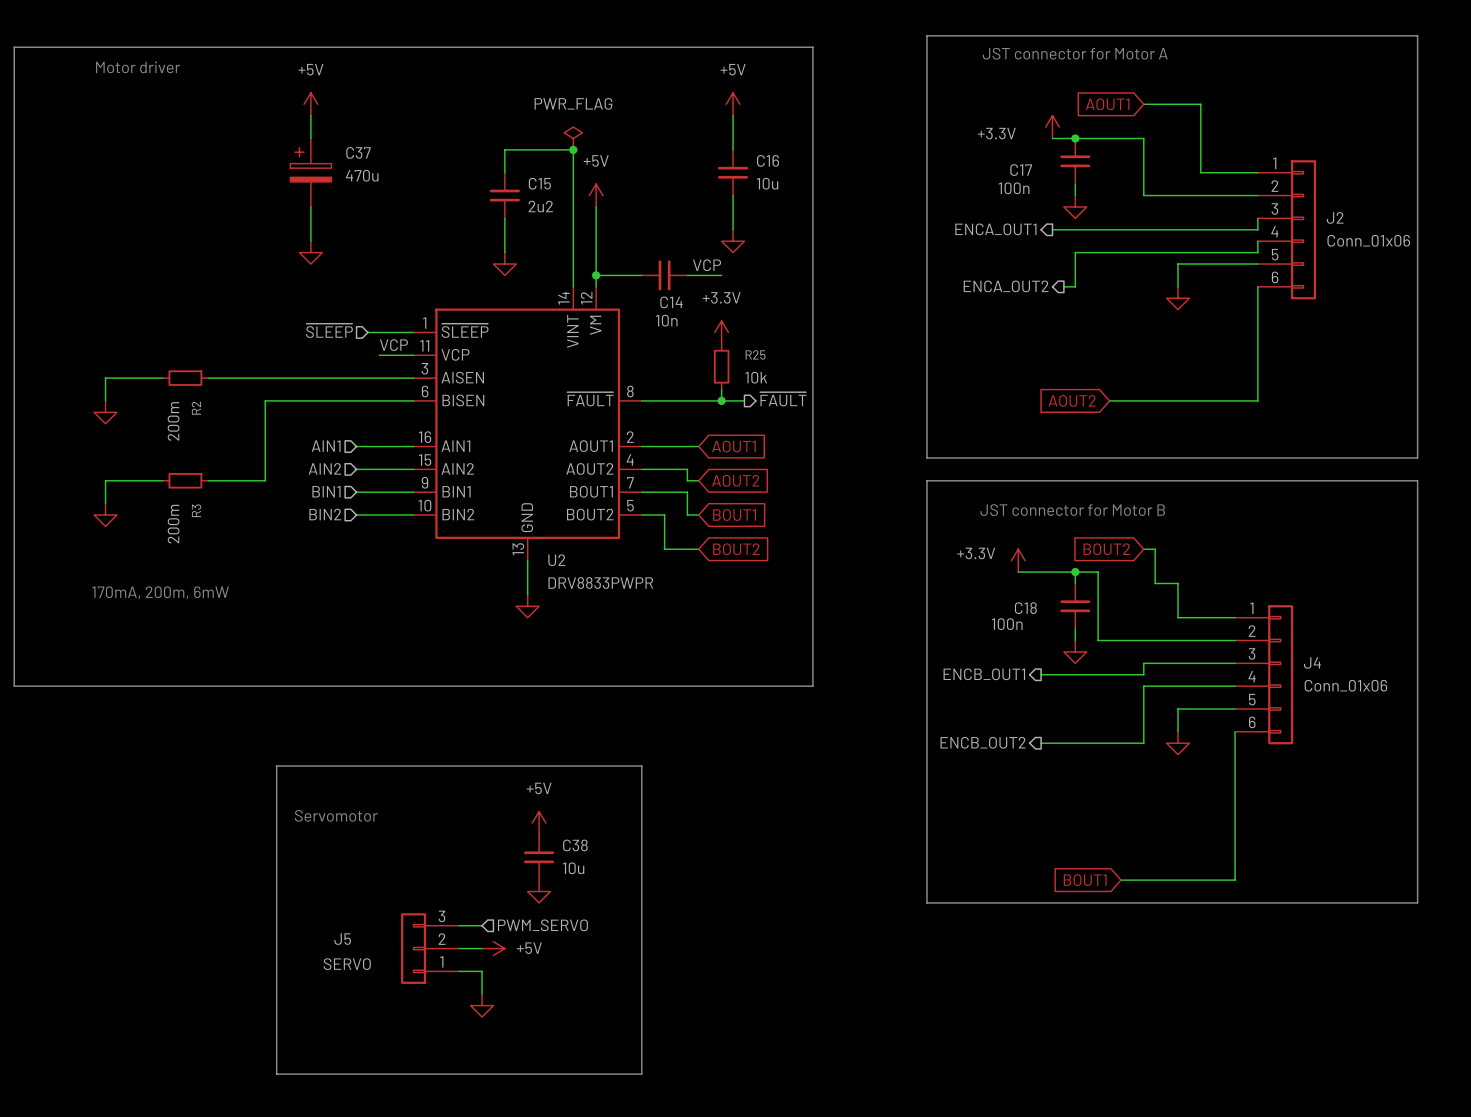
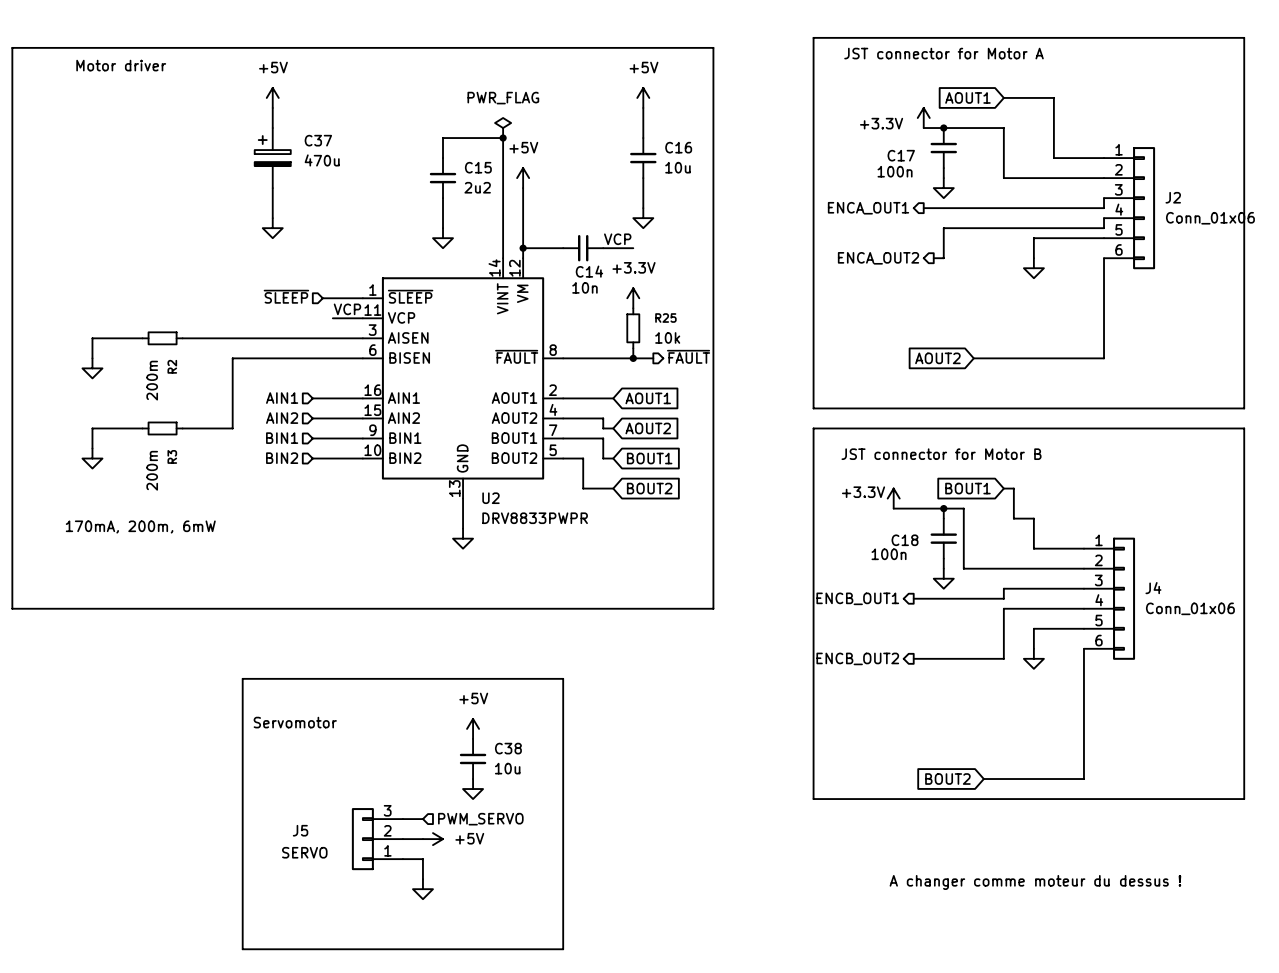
global label: BOUT2 (1106, 549) -> BOUT1 (967, 488)
global label: BOUT1 (1085, 880) -> BOUT2 (947, 779)
text: none -> A changer comme moteur du dessus ! (1035, 882)

